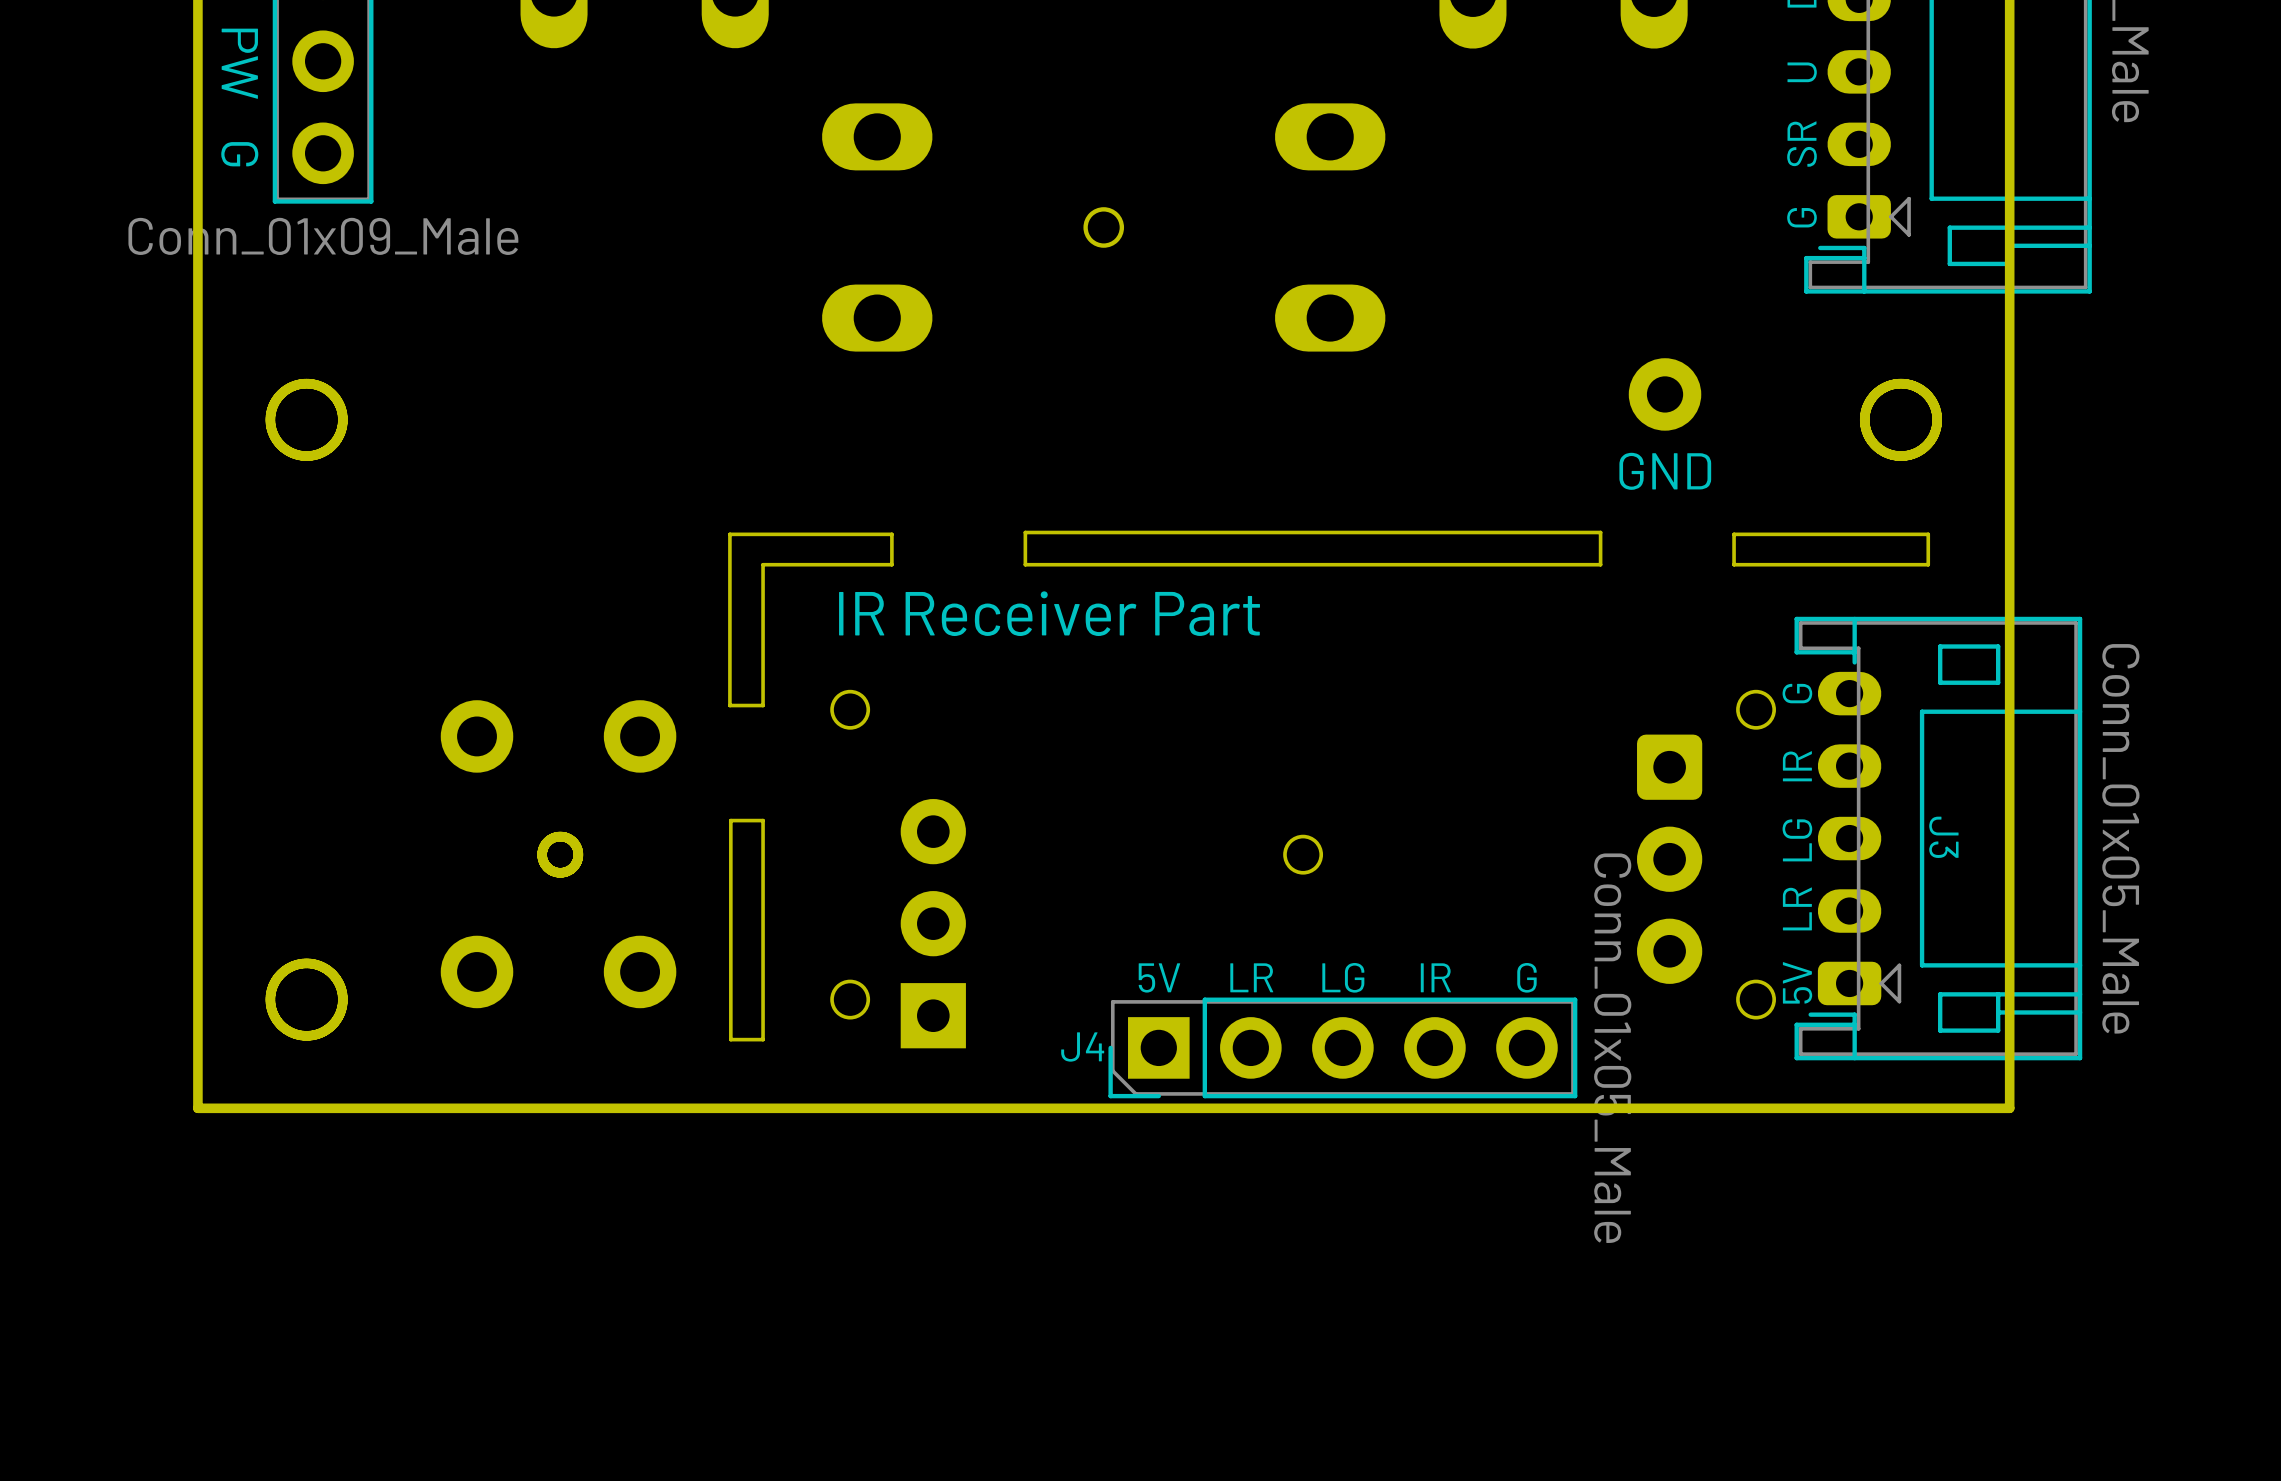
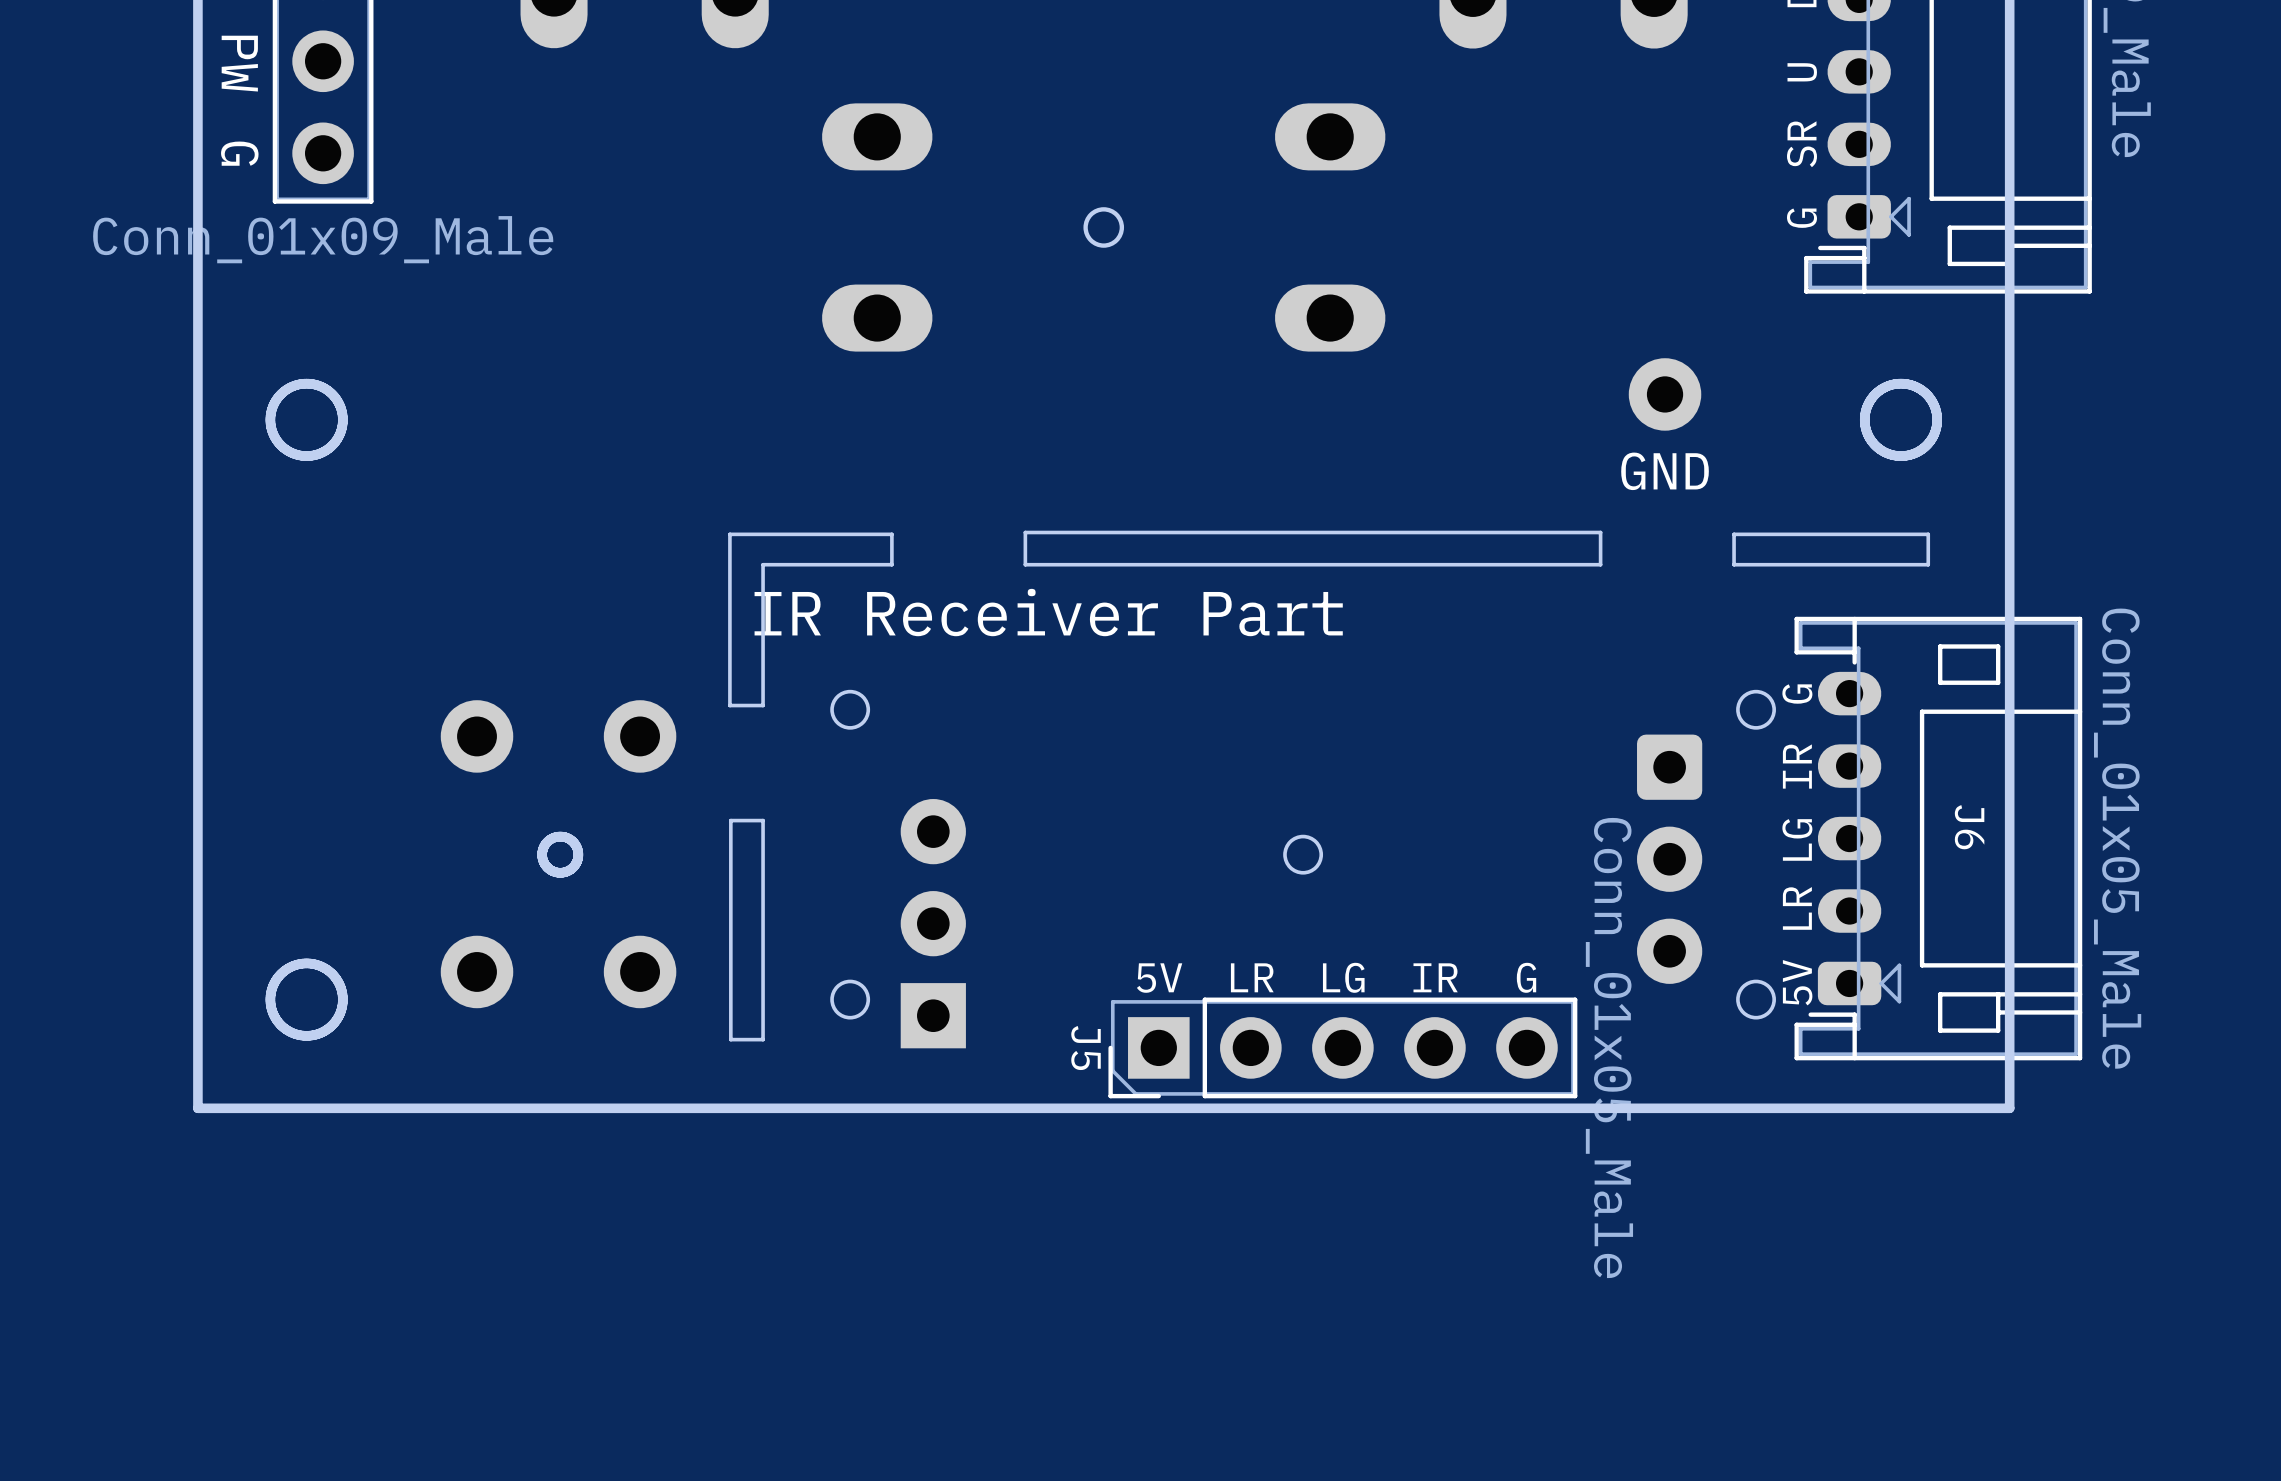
J3 name: J3 (1943, 837) -> J6 (1969, 827)
J4 name: J4 (1082, 1047) -> J5 (1086, 1048)

